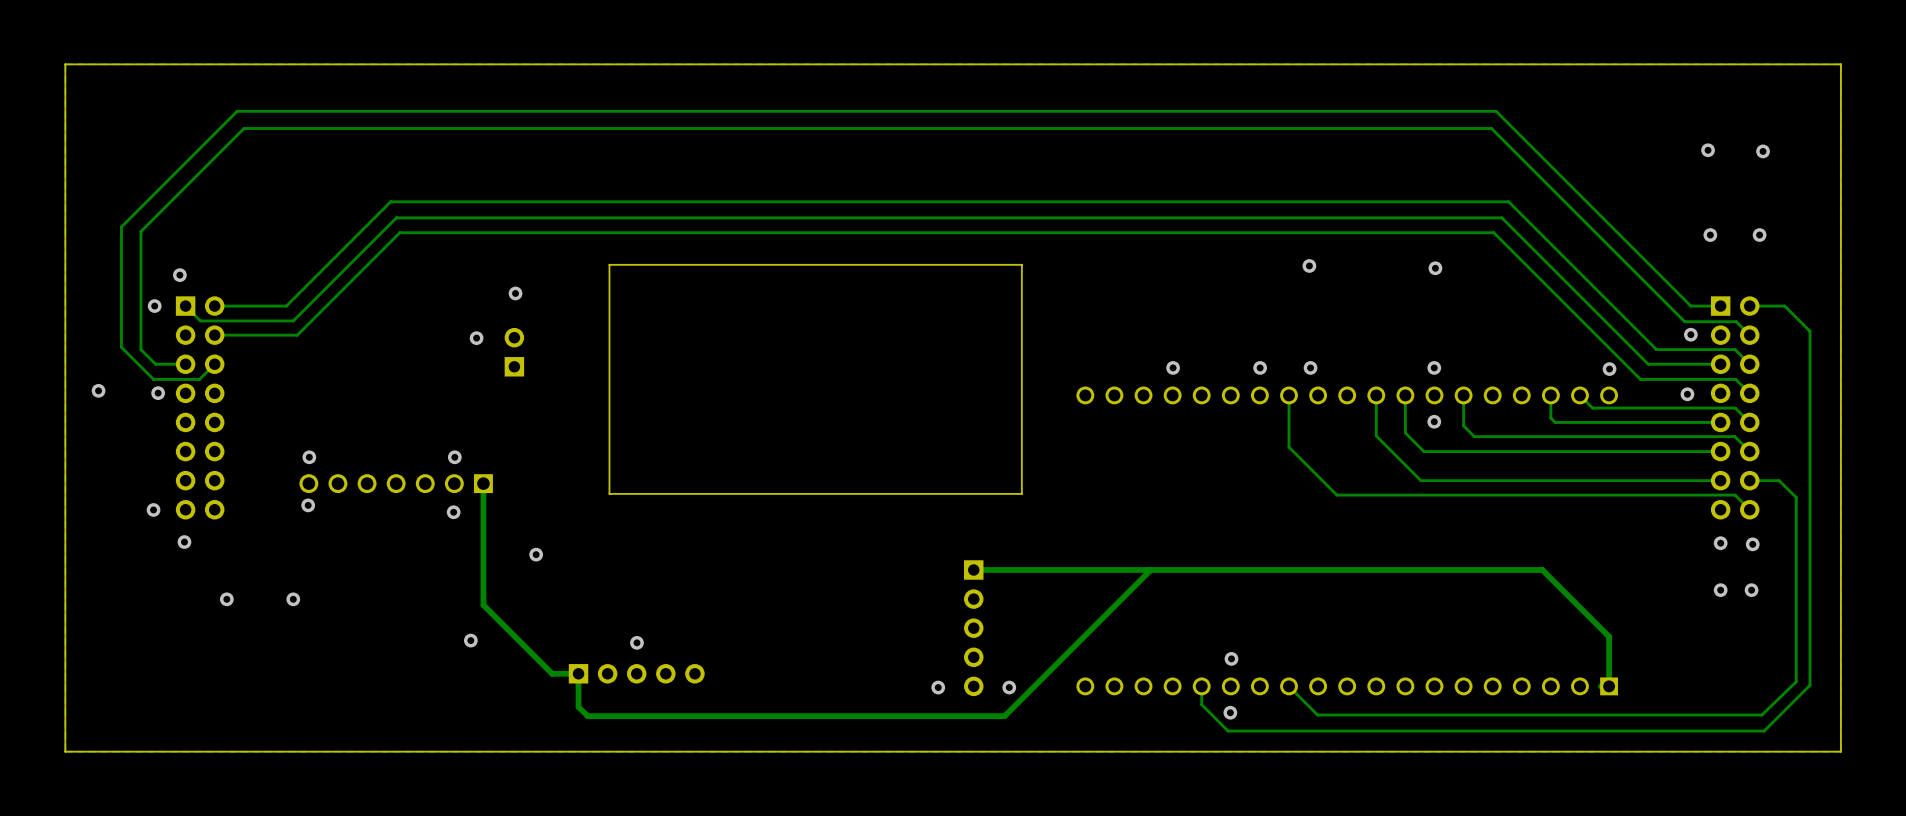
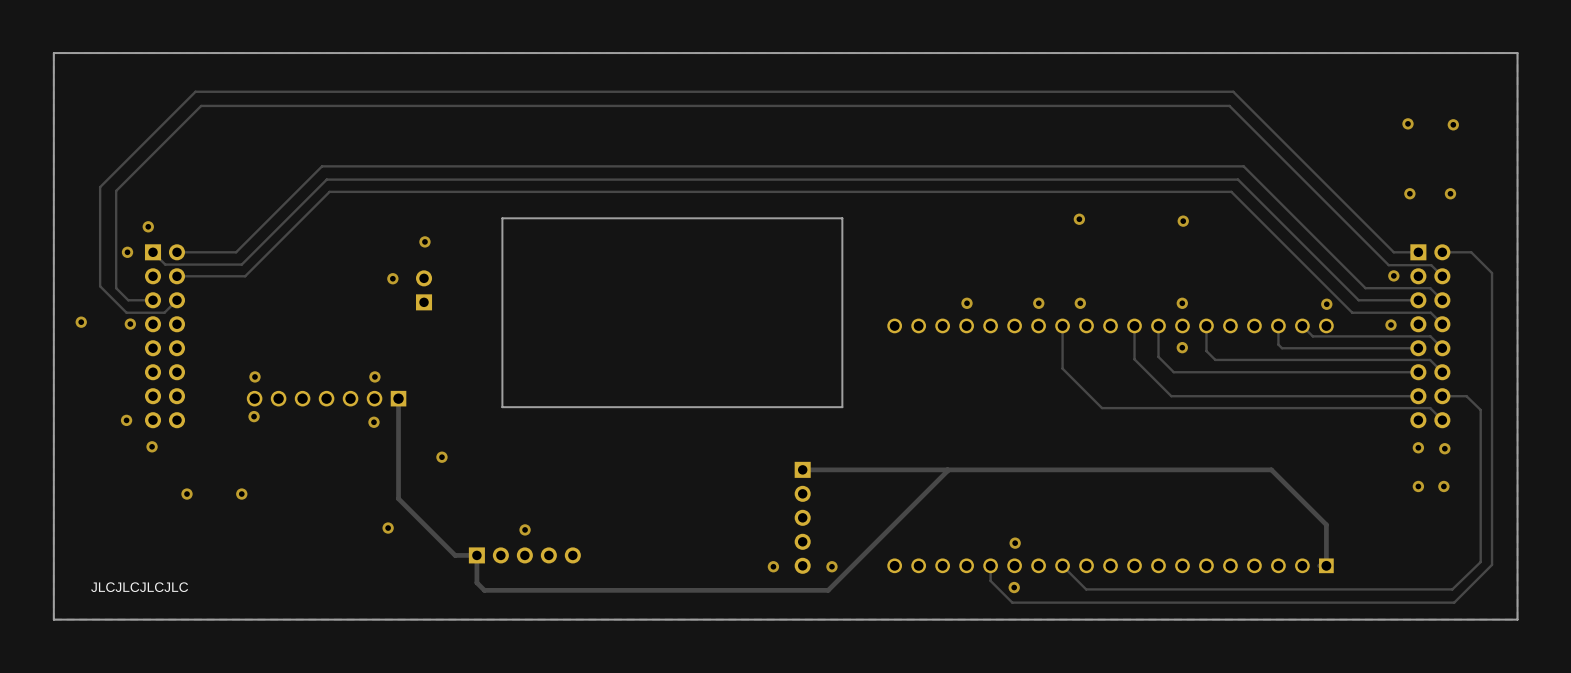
text: none -> JLCJLCJLCJLC (139, 587)

